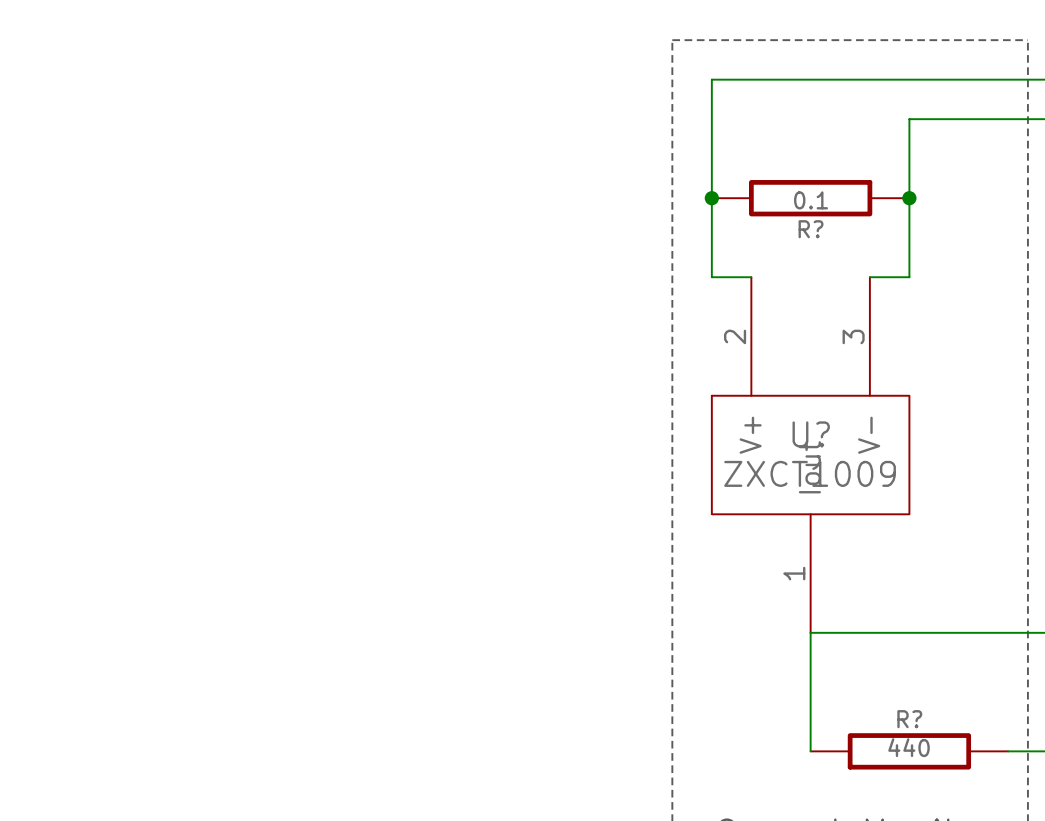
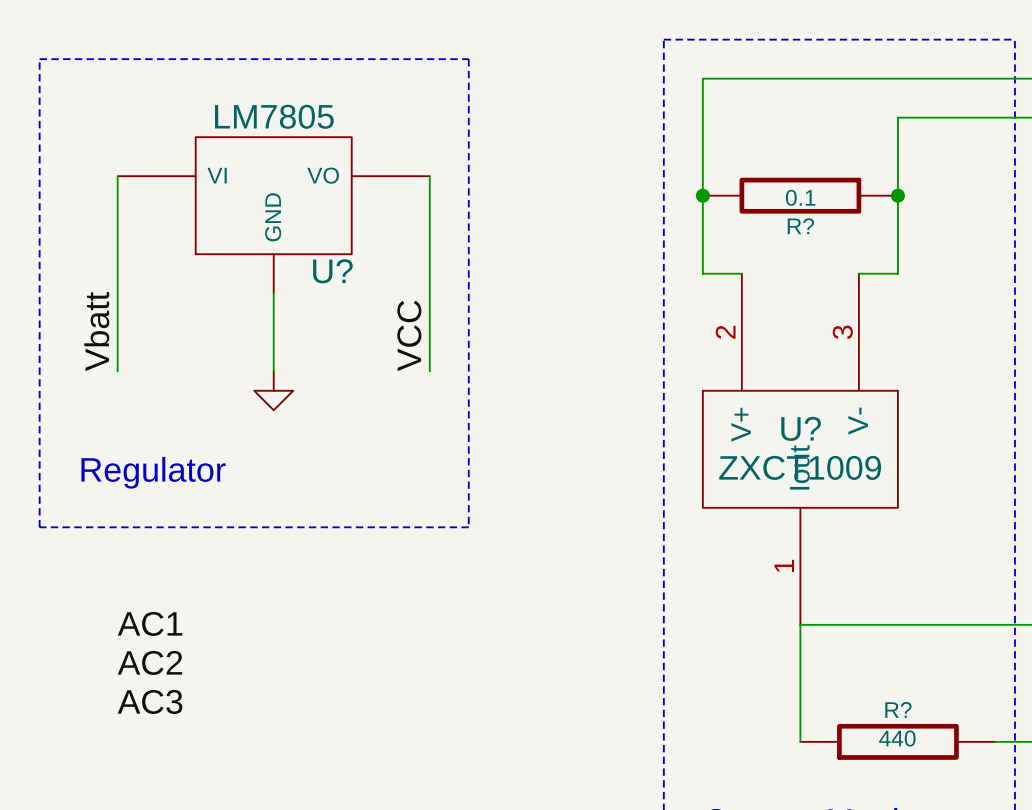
line: none -> (39, 59) (468, 59) (468, 527) (39, 527) (39, 59)
wire: none -> (117, 176) (117, 371)
wire: none -> (429, 176) (429, 371)
U?: none -> LM7805 (273, 215)
wire: none -> (273, 293) (273, 371)
label: none -> Vbatt (96, 331)
label: none -> VCC (409, 335)
power symbol: none -> (273, 390)
text: none -> Regulator (153, 472)
label: none -> AC1 (149, 623)
label: none -> AC2 (149, 662)
label: none -> AC3 (150, 701)

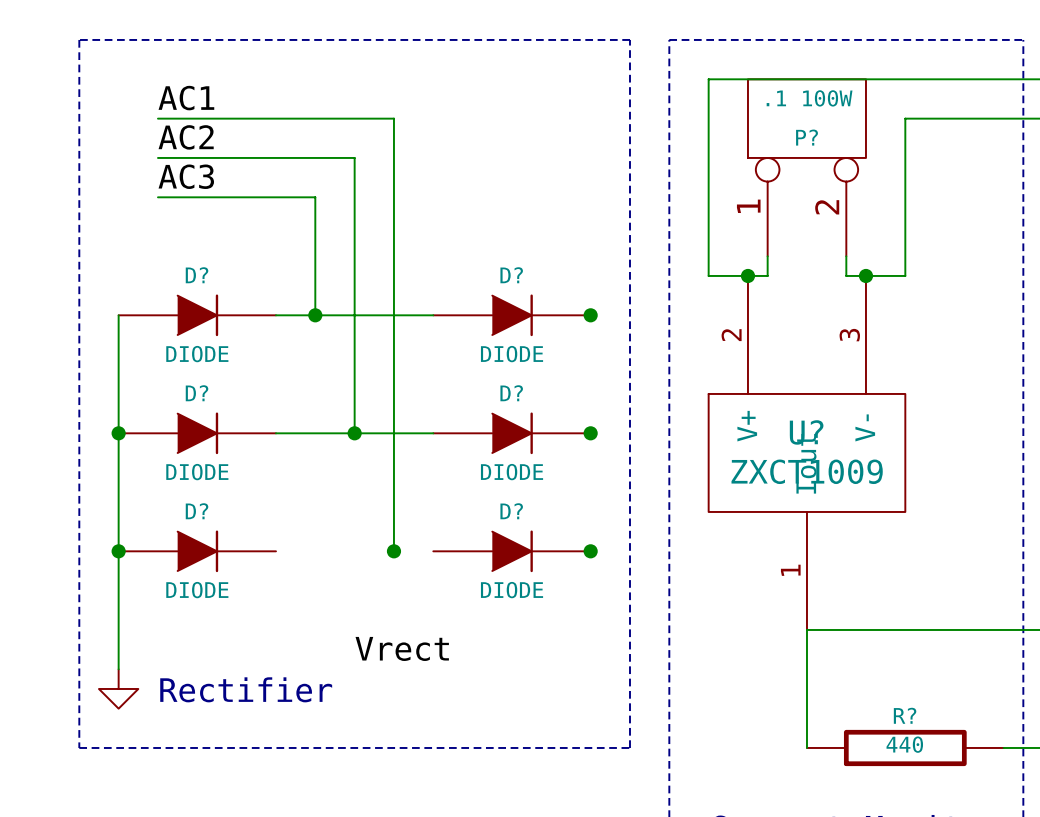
line: none -> (79, 39) (629, 39) (629, 747) (79, 747) (79, 39)
line: (39, 59) (468, 59) (468, 527) (39, 527) (39, 59) -> none
label: none -> AC1 (186, 98)
wire: none -> (157, 118) (393, 118) (393, 551)
label: none -> AC2 (186, 137)
wire: none -> (157, 157) (354, 157) (354, 433)
P?: none -> .1 100W (806, 167)
label: none -> AC3 (186, 176)
wire: (117, 176) (117, 312) -> none
wire: (429, 176) (429, 371) -> none
wire: none -> (157, 197) (315, 197) (315, 315)
junction: (702, 195) -> none
R?: 0.1 (800, 195) -> none
junction: (897, 195) -> none
U?: LM7805 (273, 215) -> none
wire: none -> (767, 256) (767, 275) (747, 275)
wire: none -> (846, 256) (846, 275) (865, 275)
junction: none -> (747, 275)
junction: none -> (865, 275)
wire: (273, 293) (273, 371) -> none
D?: none -> DIODE (197, 315)
wire: none -> (275, 315) (433, 315)
junction: none -> (315, 315)
D?: none -> DIODE (511, 315)
junction: none -> (590, 315)
label: Vbatt (96, 331) -> none
label: VCC (409, 335) -> none
wire: none -> (118, 374) (118, 669)
power symbol: (273, 390) -> none
junction: none -> (118, 433)
D?: none -> DIODE (197, 433)
wire: none -> (275, 433) (433, 433)
junction: none -> (354, 433)
D?: none -> DIODE (511, 433)
junction: none -> (590, 433)
text: Regulator (153, 472) -> none
junction: none -> (118, 551)
D?: none -> DIODE (197, 551)
junction: none -> (393, 551)
D?: none -> DIODE (511, 551)
junction: none -> (590, 551)
label: AC1 (149, 623) -> none
label: none -> Vrect (402, 648)
label: AC2 (149, 662) -> none
power symbol: none -> (118, 688)
text: none -> Rectifier (246, 689)
label: AC3 (150, 701) -> none

